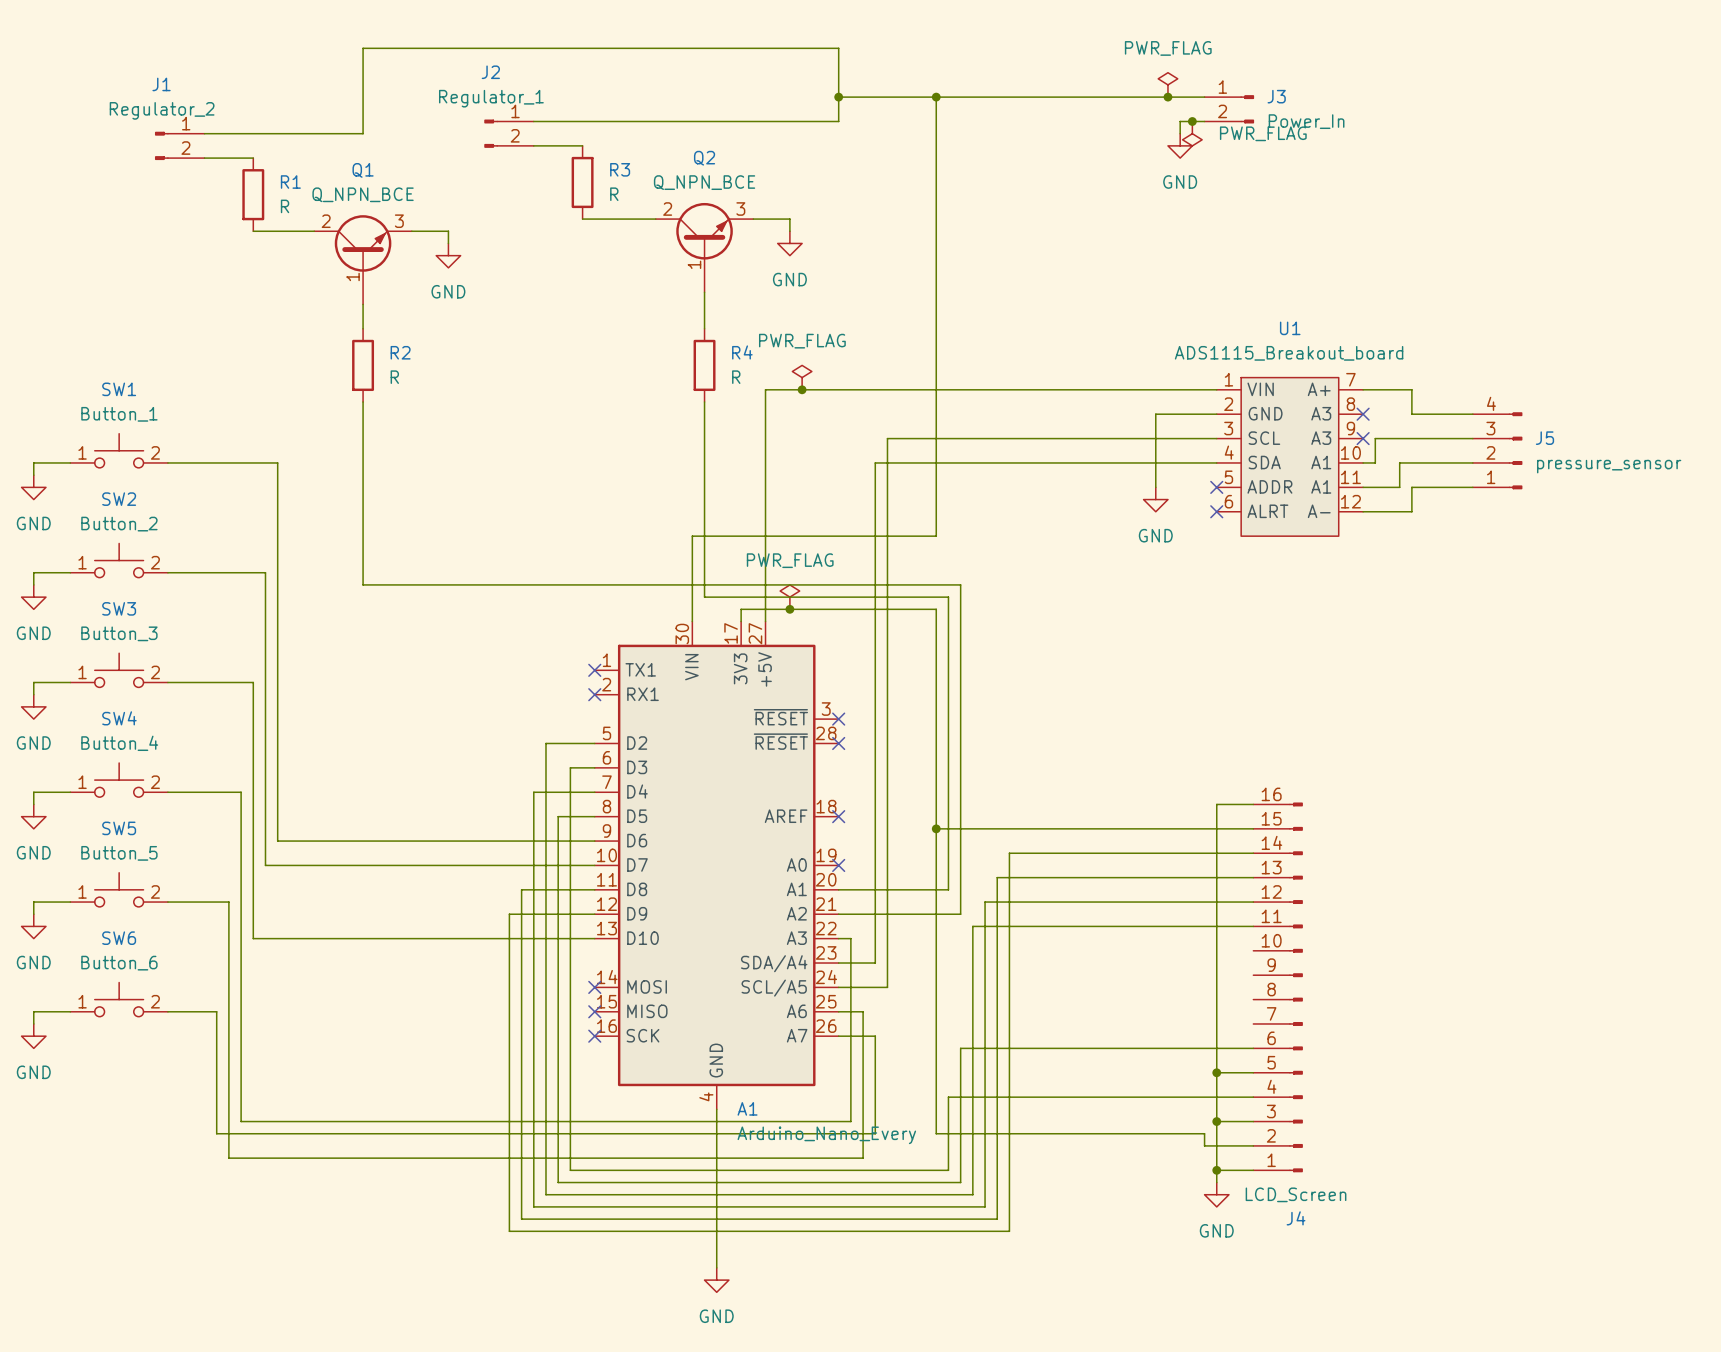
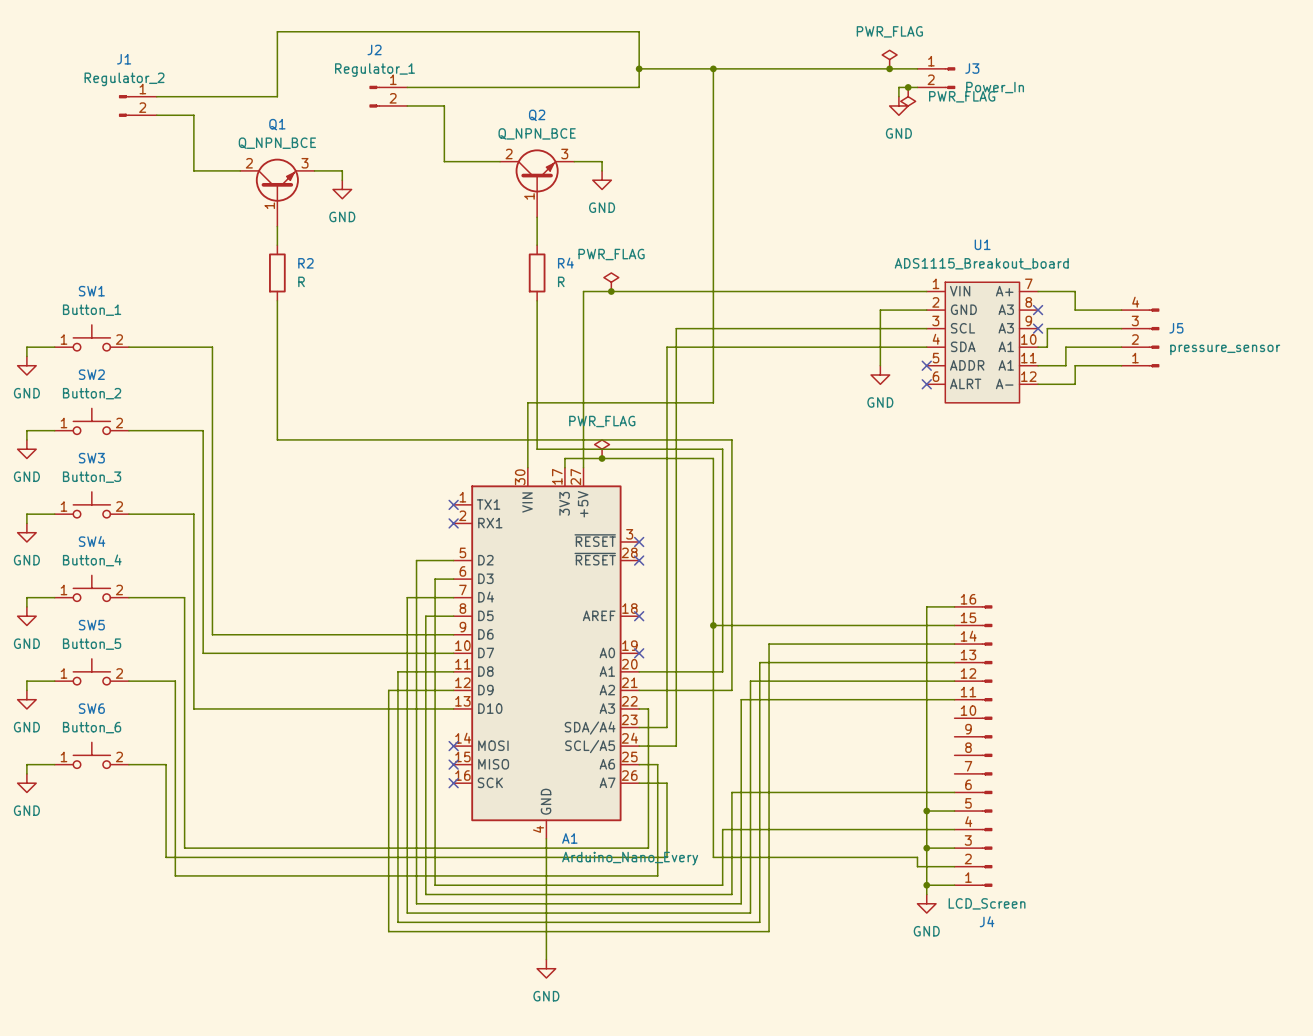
wire: none -> (444, 105) (444, 161)
wire: none -> (193, 115) (193, 170)
R3: R (582, 182) -> none
R1: R (253, 194) -> none

